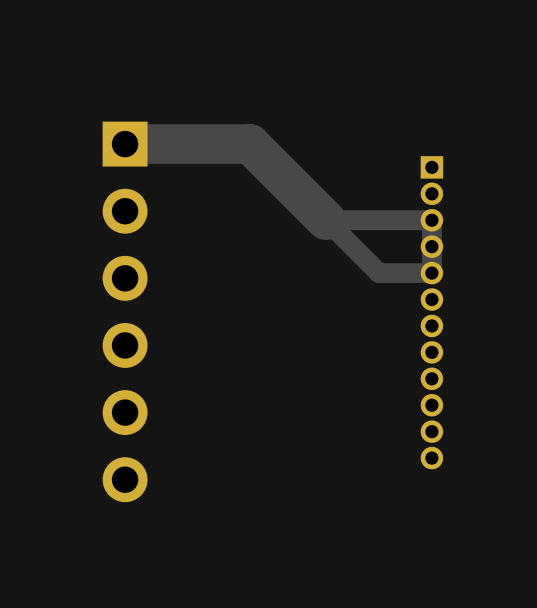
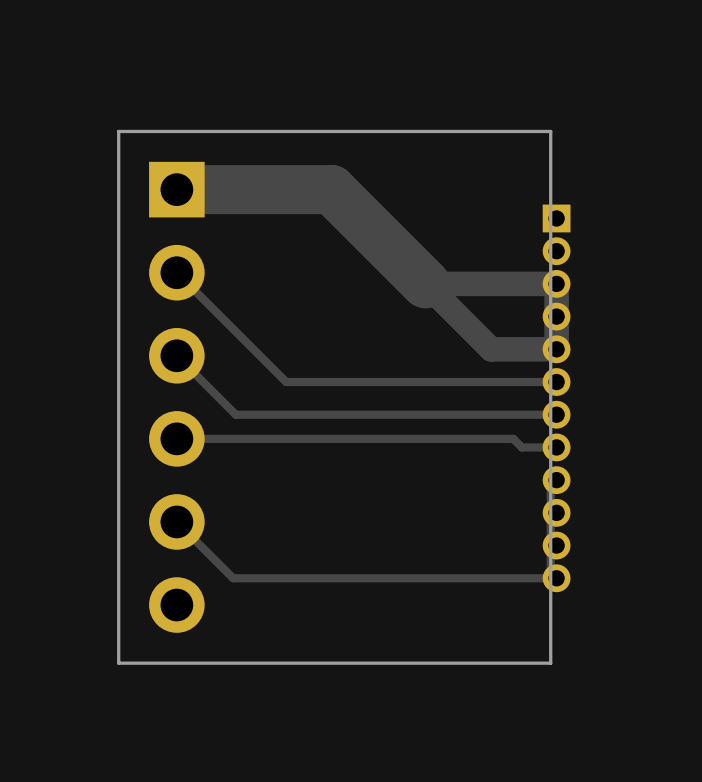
board edge: none -> (550, 131) (118, 131) (118, 663) (550, 663) (550, 131)
track: none -> (176, 272) (286, 382) (550, 382)
track: none -> (176, 355) (235, 414) (550, 414)
track: none -> (176, 438) (513, 438) (521, 447) (550, 447)
track: none -> (550, 480) (550, 578) (233, 578) (176, 521)

